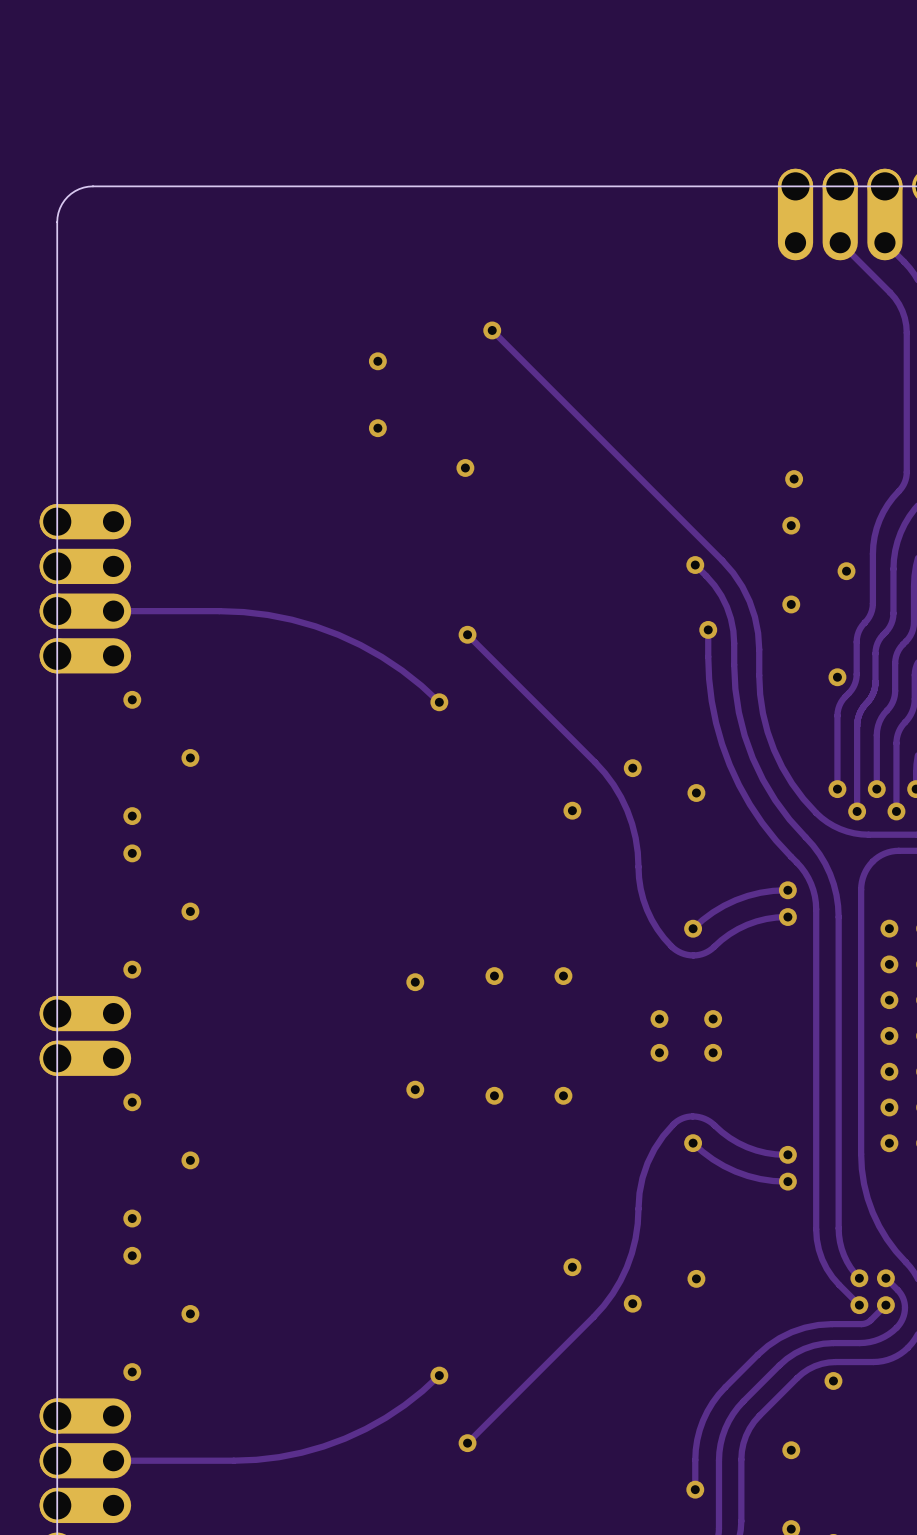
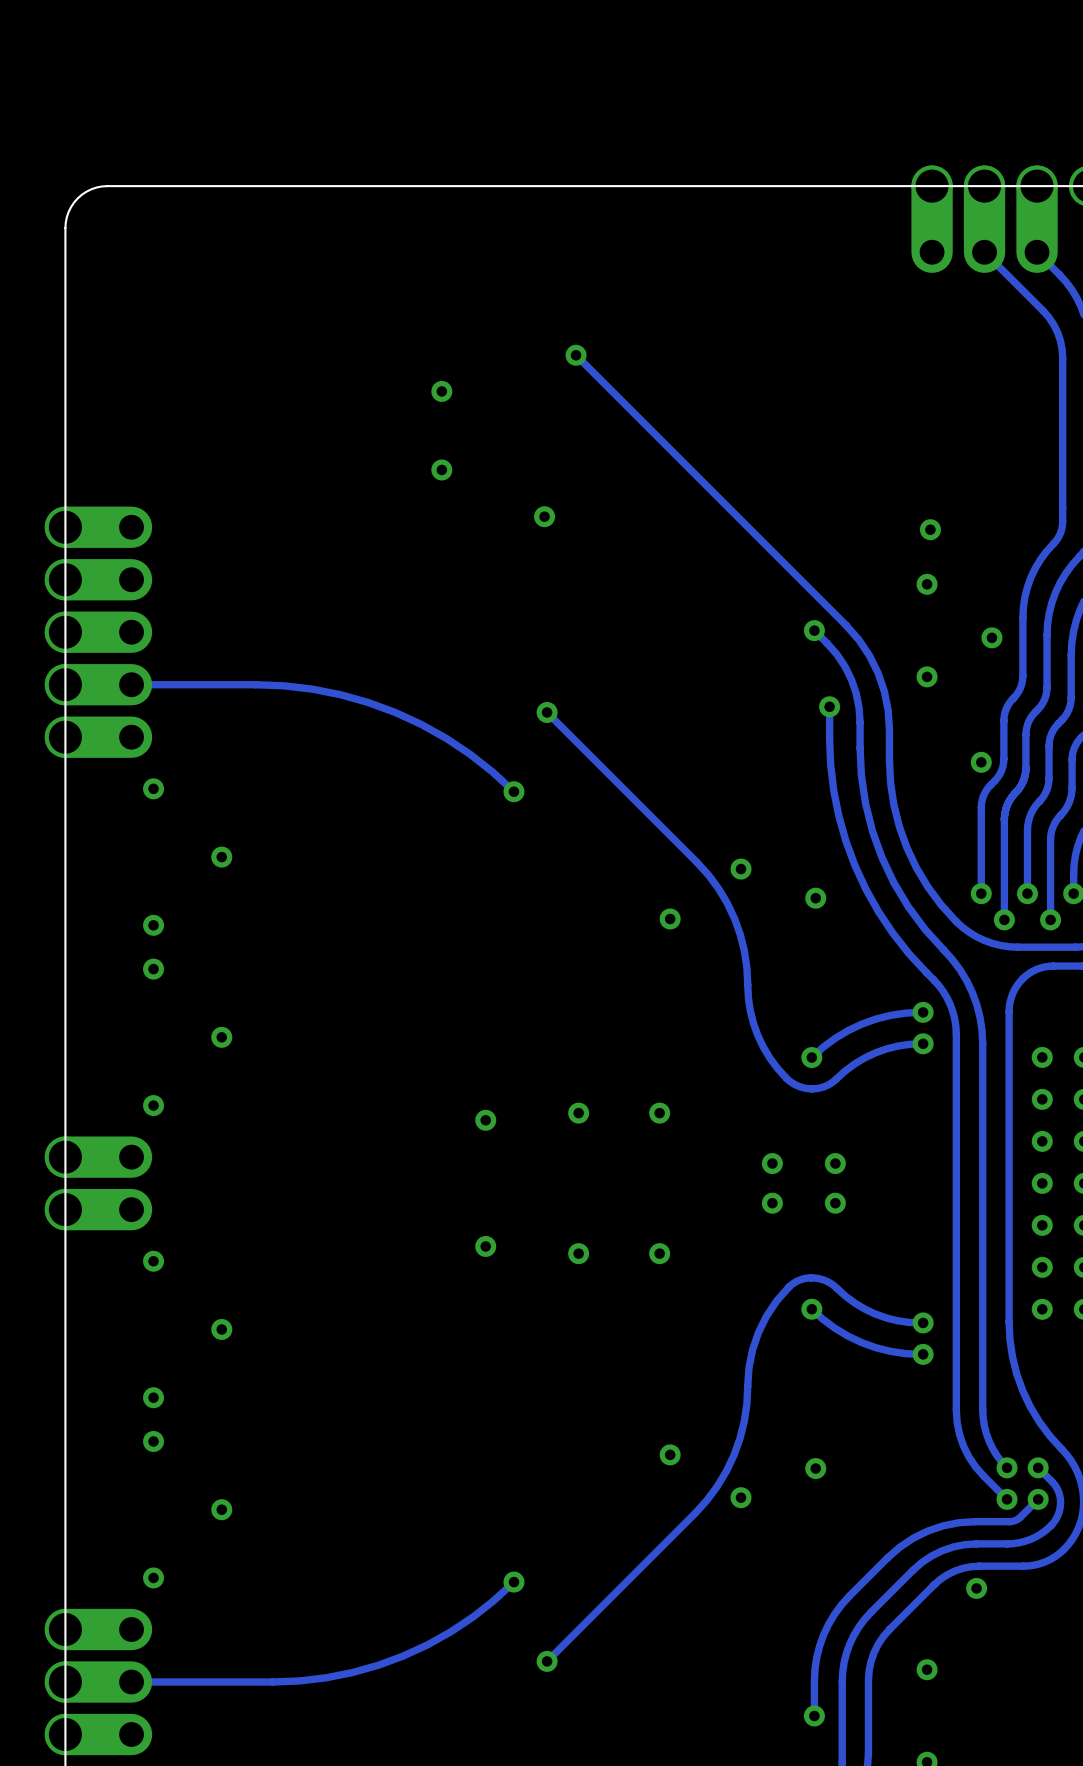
part: none -> (98, 527)

